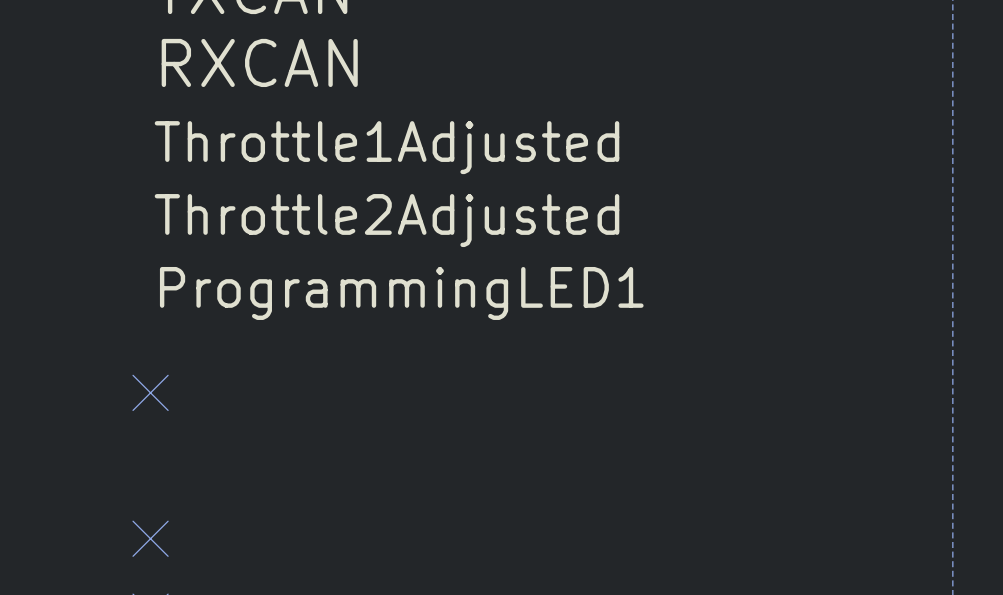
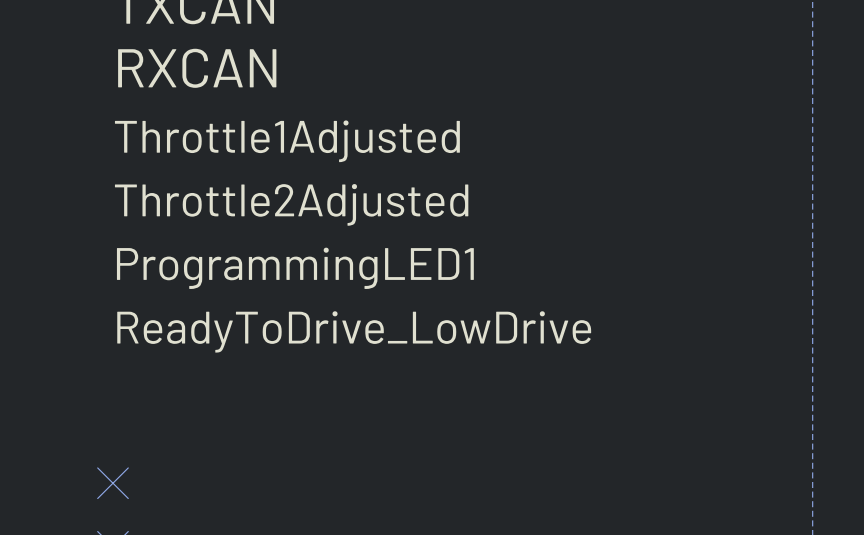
label: none -> ReadyToDrive_LowDrive (354, 331)
no-connect mark: (150, 392) -> none

